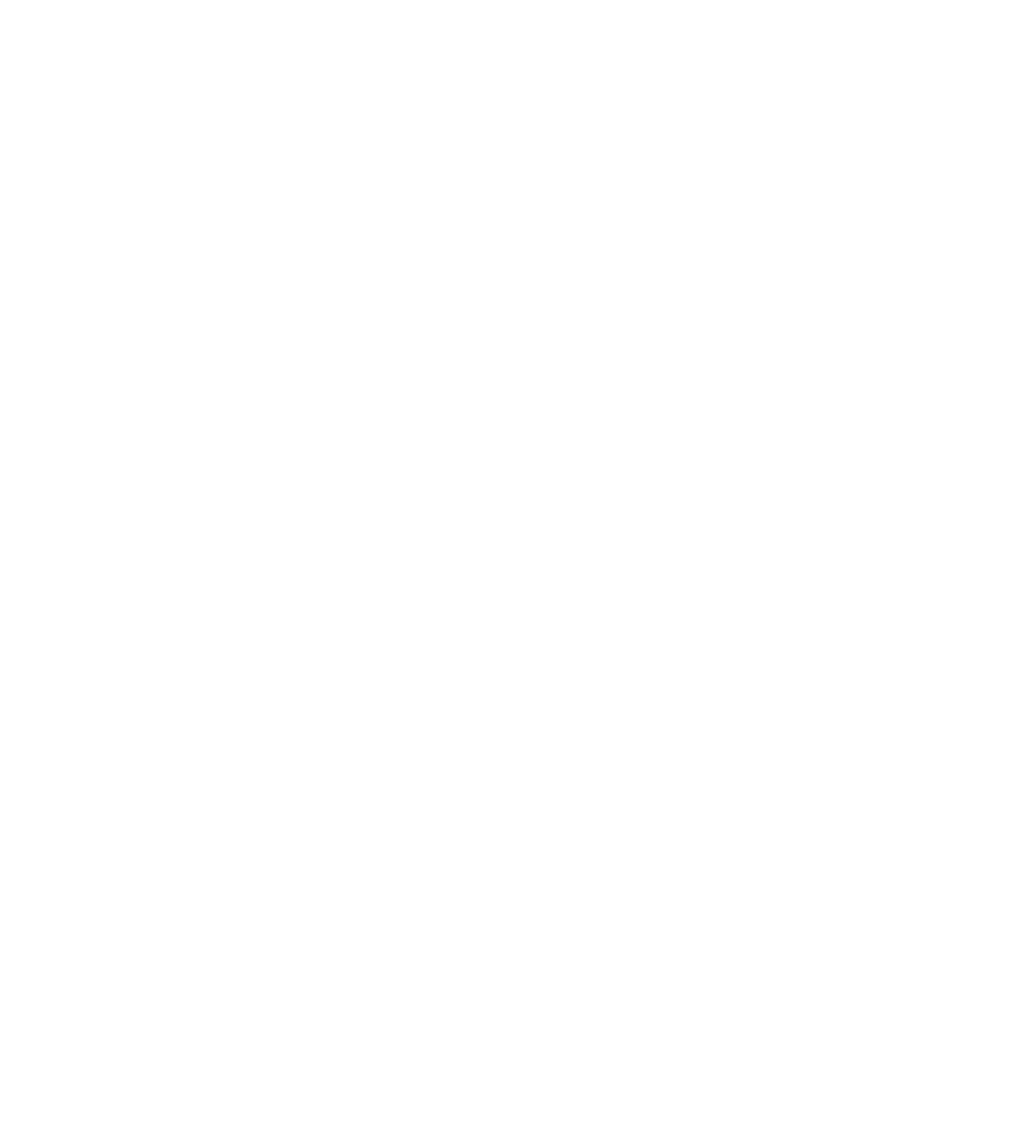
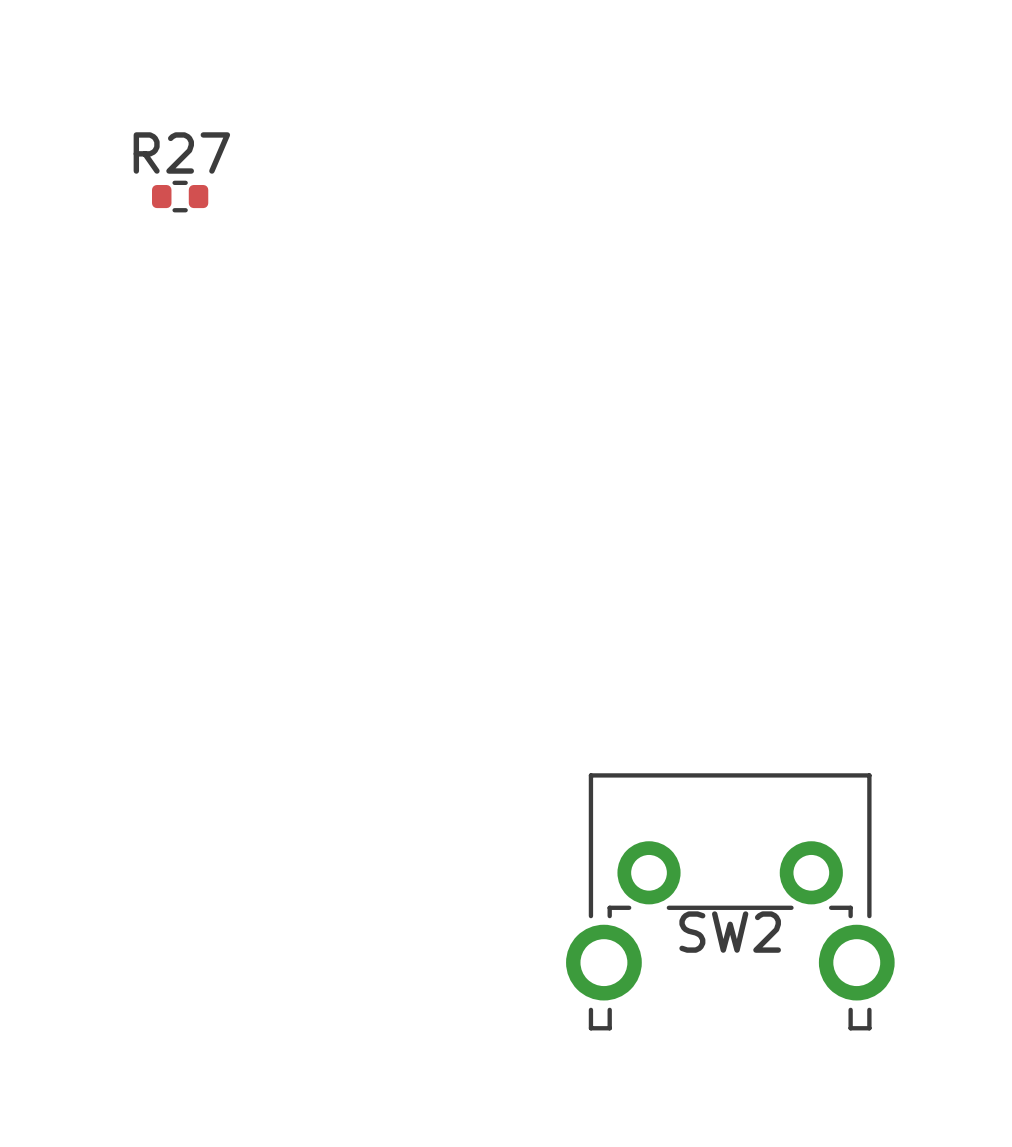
R27: none -> (180, 196)
SW2: none -> (730, 901)

